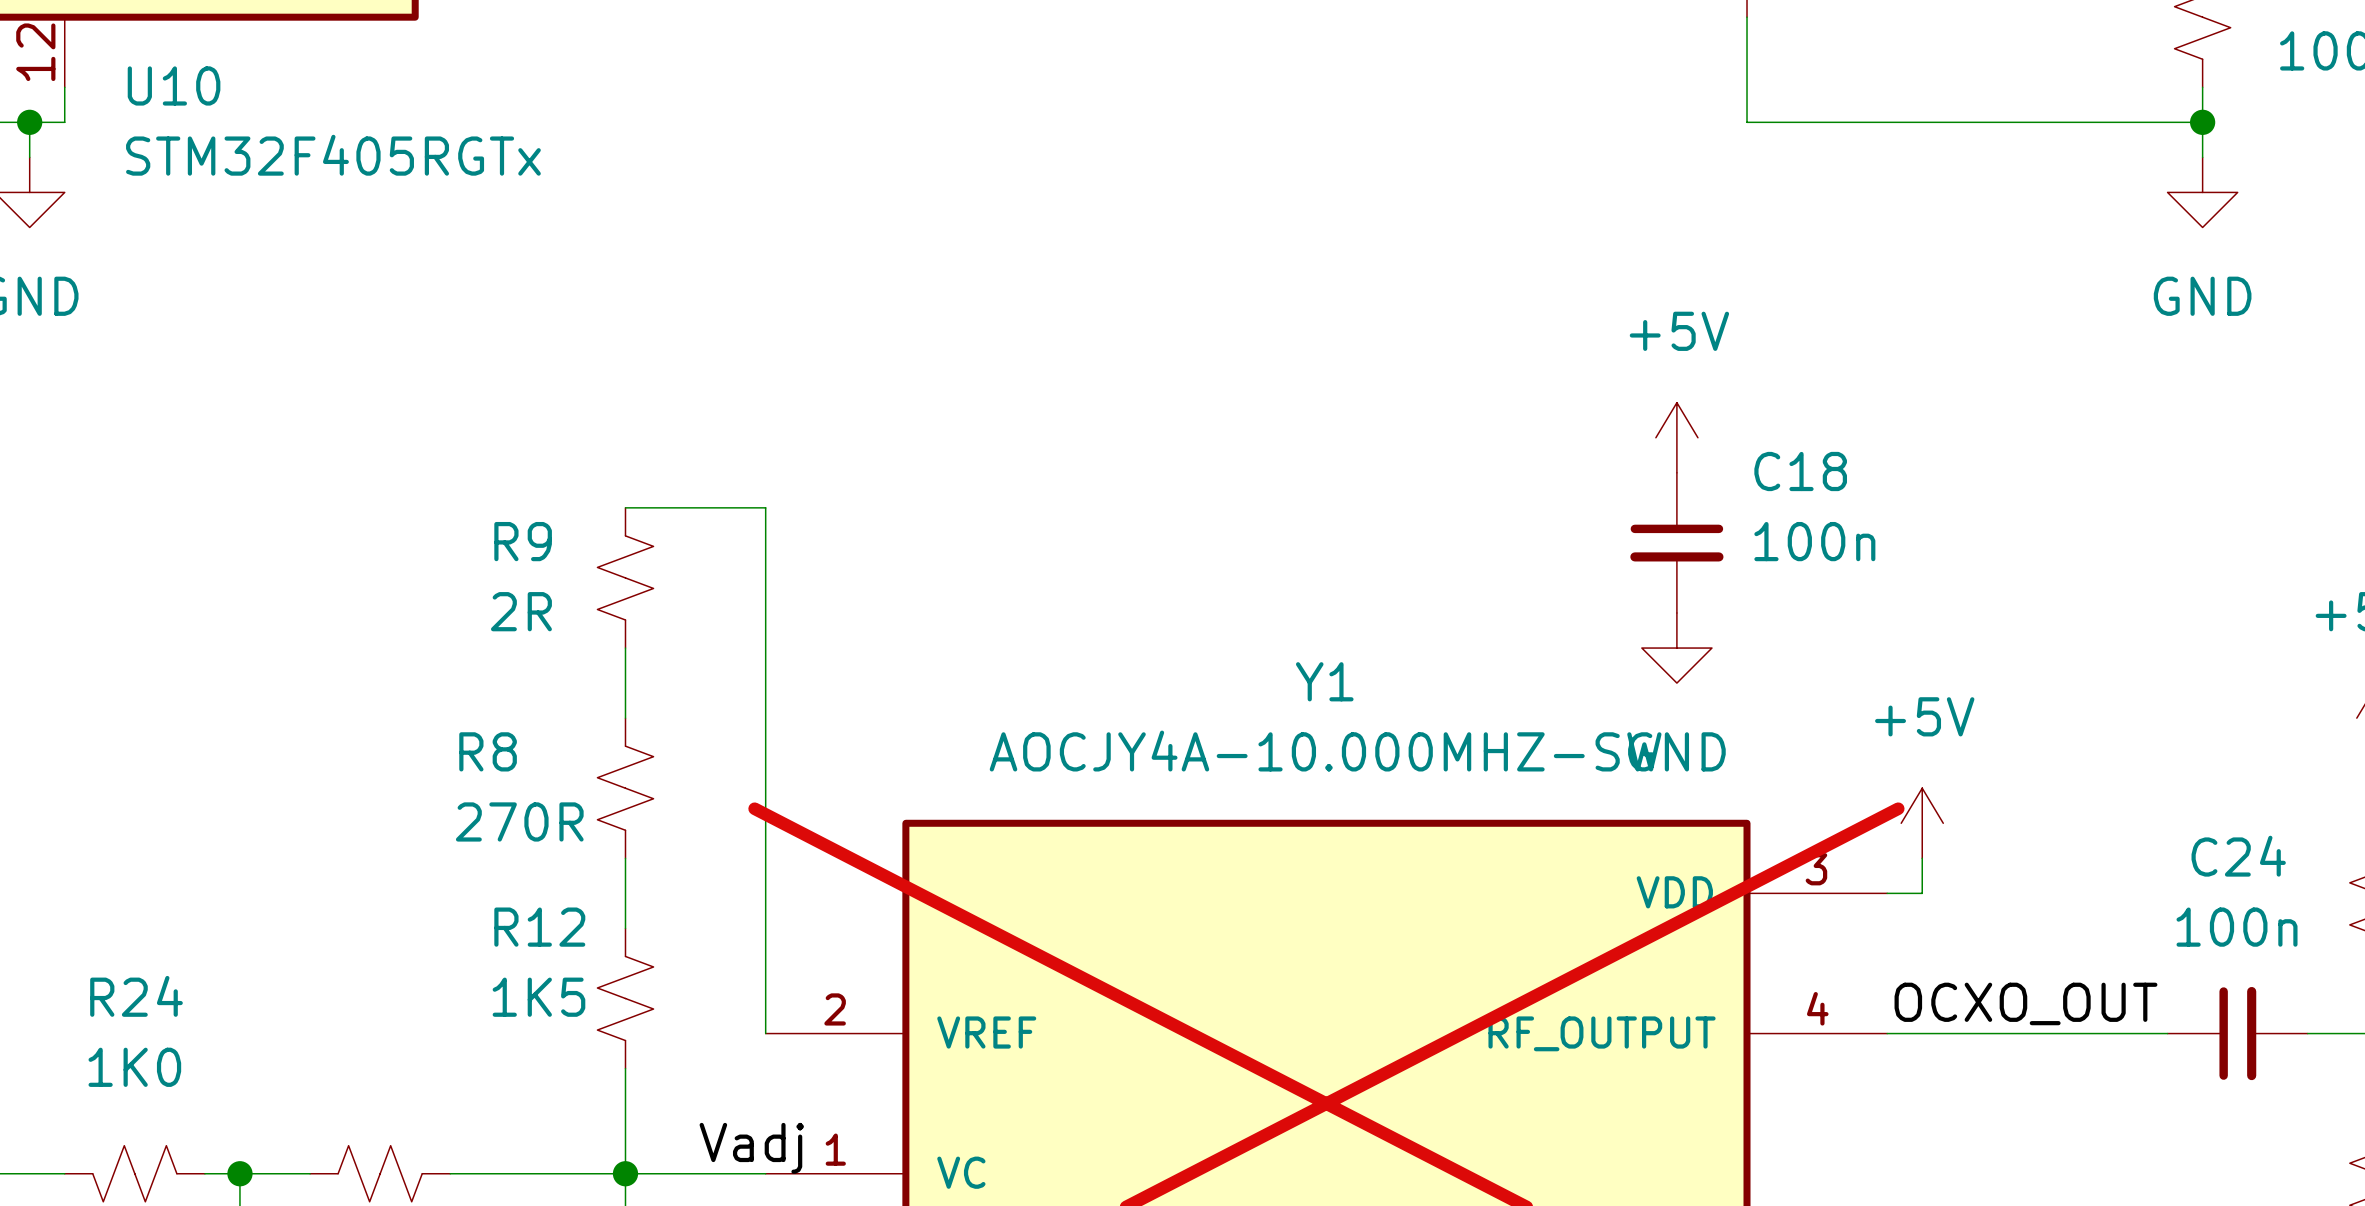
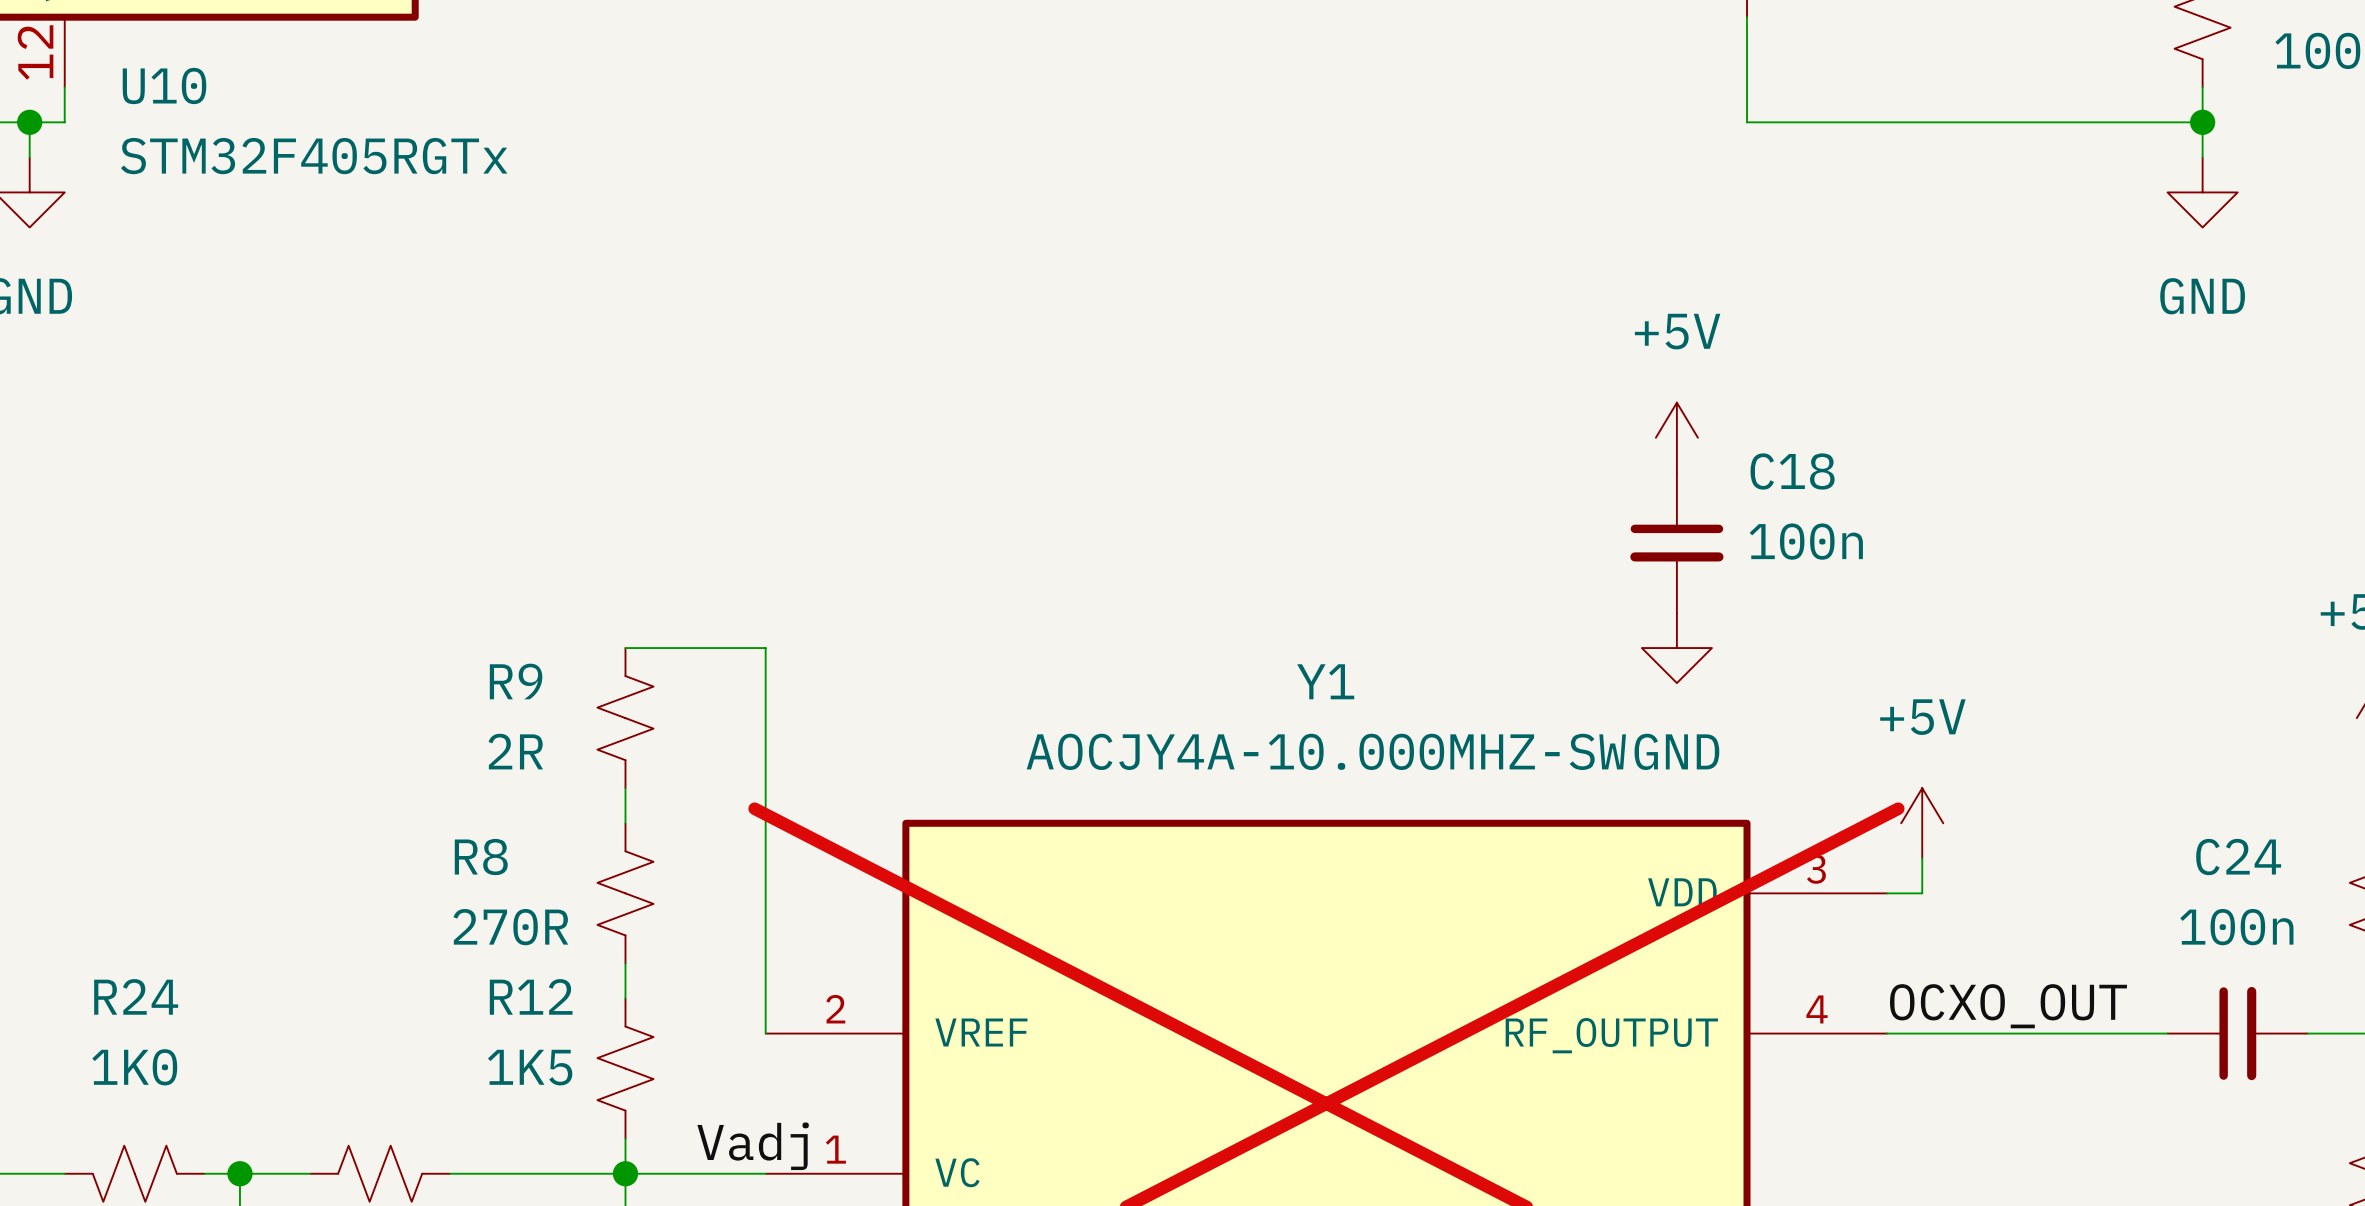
wire: (625, 507) (765, 507) (765, 648) -> (625, 648) (765, 648)
R9 position: (625, 577) -> (625, 718)
wire: (625, 648) (625, 718) -> none
wire: none -> (625, 788) (625, 823)
R8 position: (625, 788) -> (625, 893)
wire: (625, 858) (625, 928) -> none
wire: none -> (625, 963) (625, 998)
R12 position: (625, 998) -> (625, 1068)
wire: (625, 1068) (625, 1138) -> none

